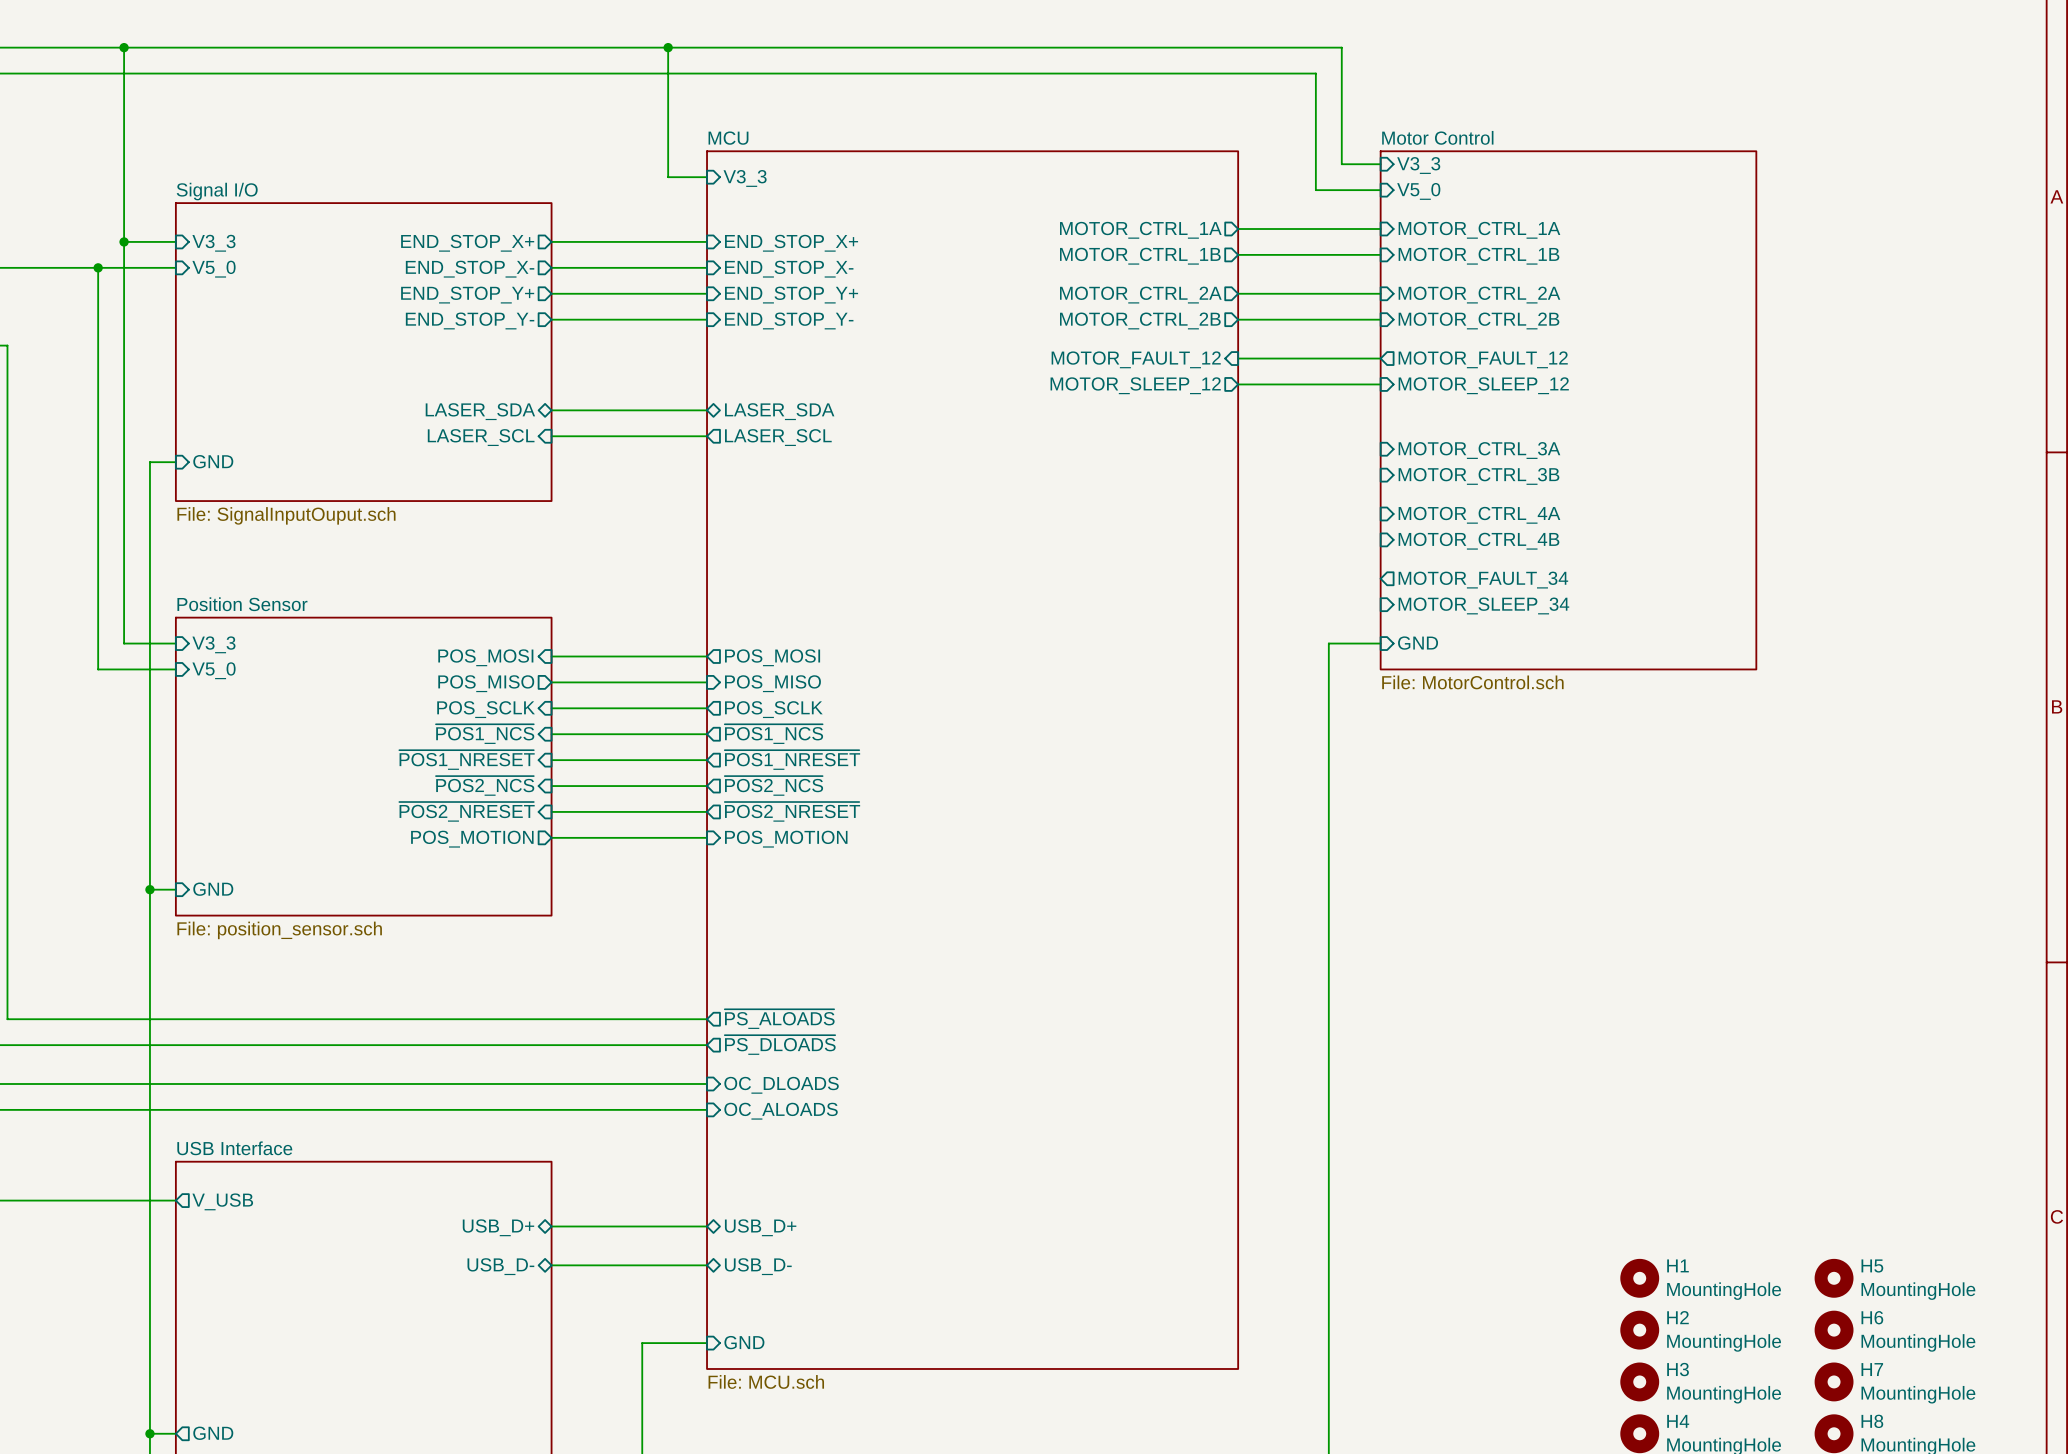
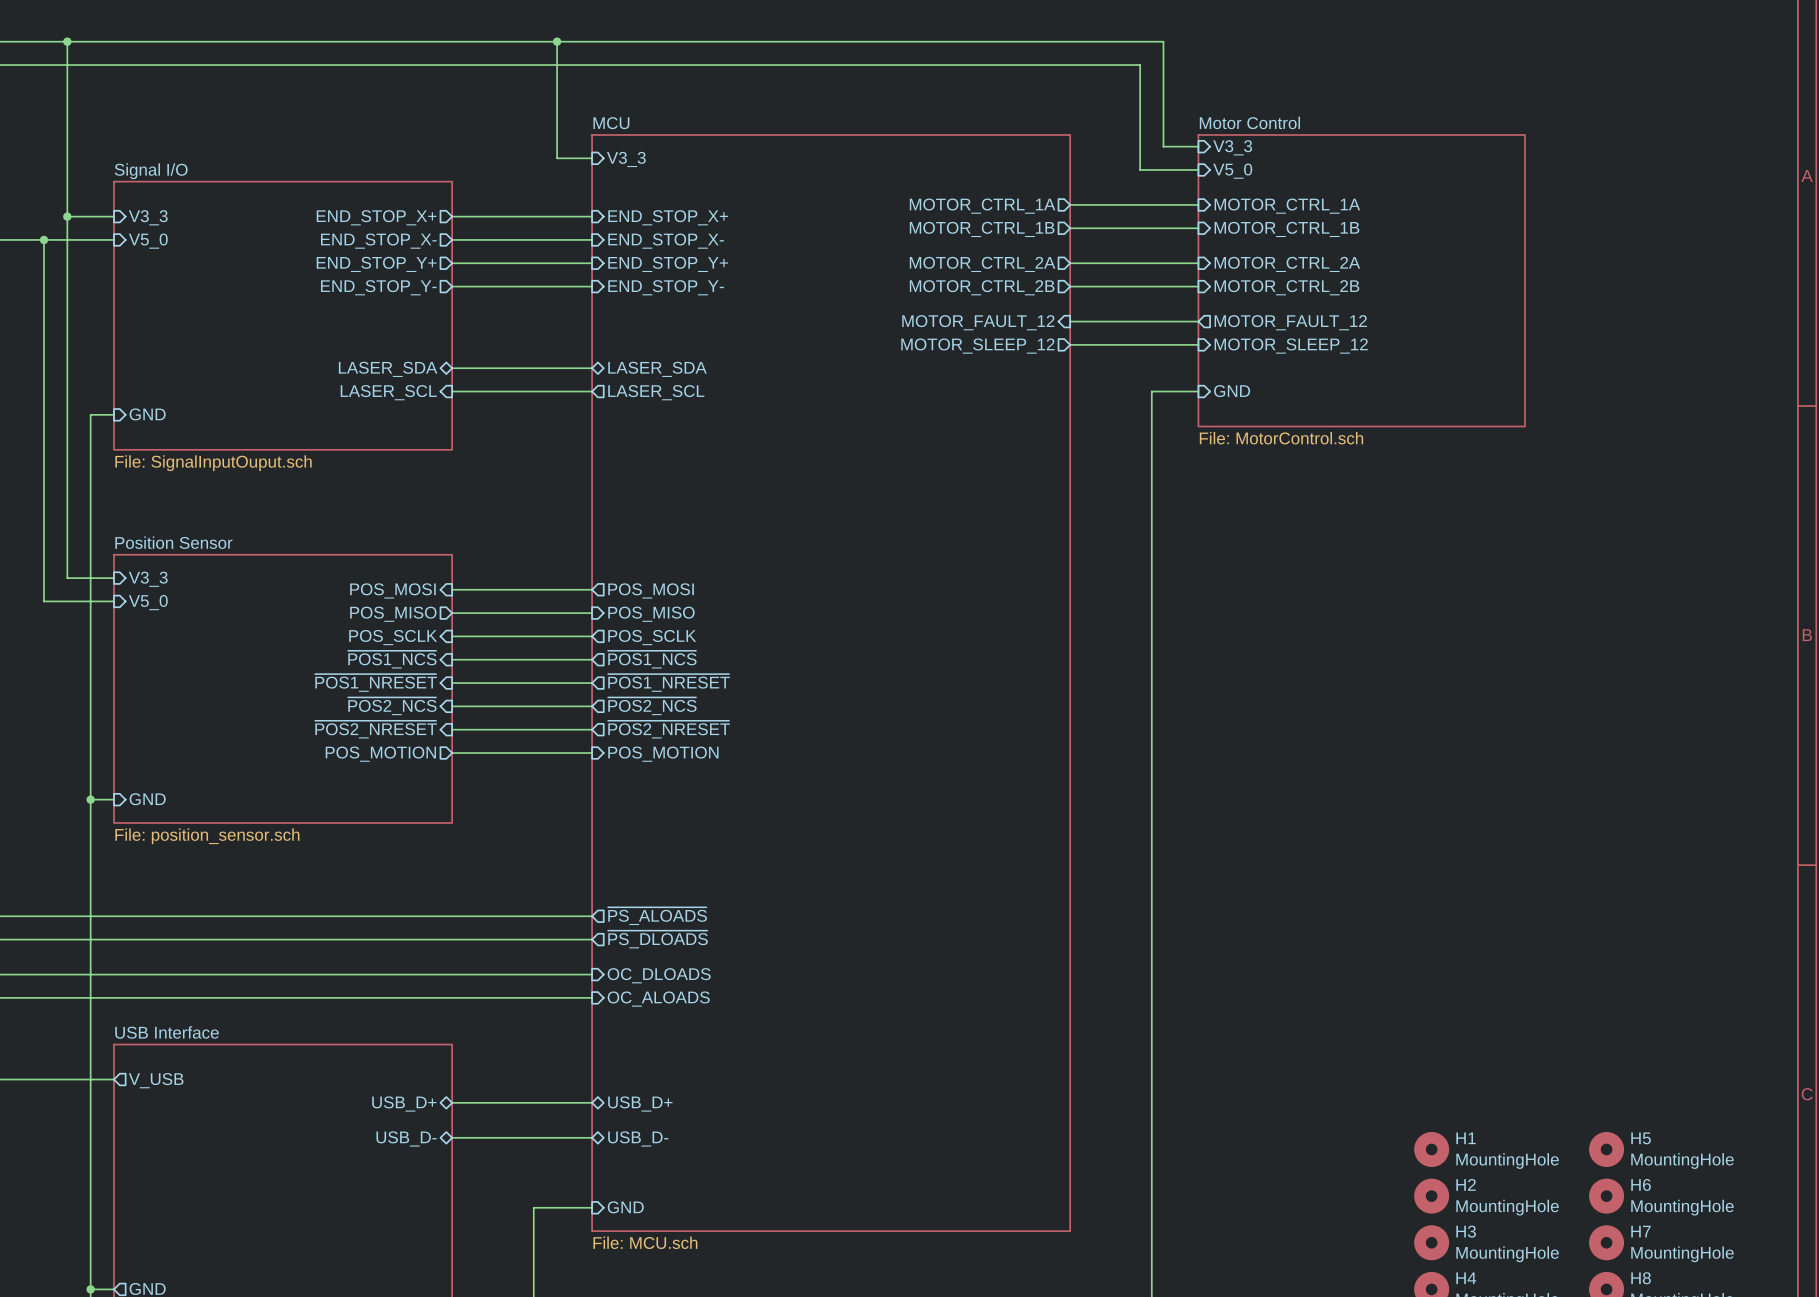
sheet Motor Control: none -> File: MotorControl.sch (1361, 280)
sheet Motor Control: File: MotorControl.sch (1568, 410) -> none
sheet pin: MOTOR_CTRL_3A (1479, 450) -> none
sheet pin: MOTOR_CTRL_3B (1478, 476) -> none
sheet pin: MOTOR_CTRL_4A (1479, 515) -> none
sheet pin: MOTOR_CTRL_4B (1478, 541) -> none
sheet pin: MOTOR_FAULT_34 (1483, 580) -> none
sheet pin: MOTOR_SLEEP_34 (1483, 605) -> none
wire: (1328, 643) (1380, 643) -> (1151, 578) (1151, 391) (1198, 391)
sheet pin position: GND (1418, 643) -> GND (1232, 391)

